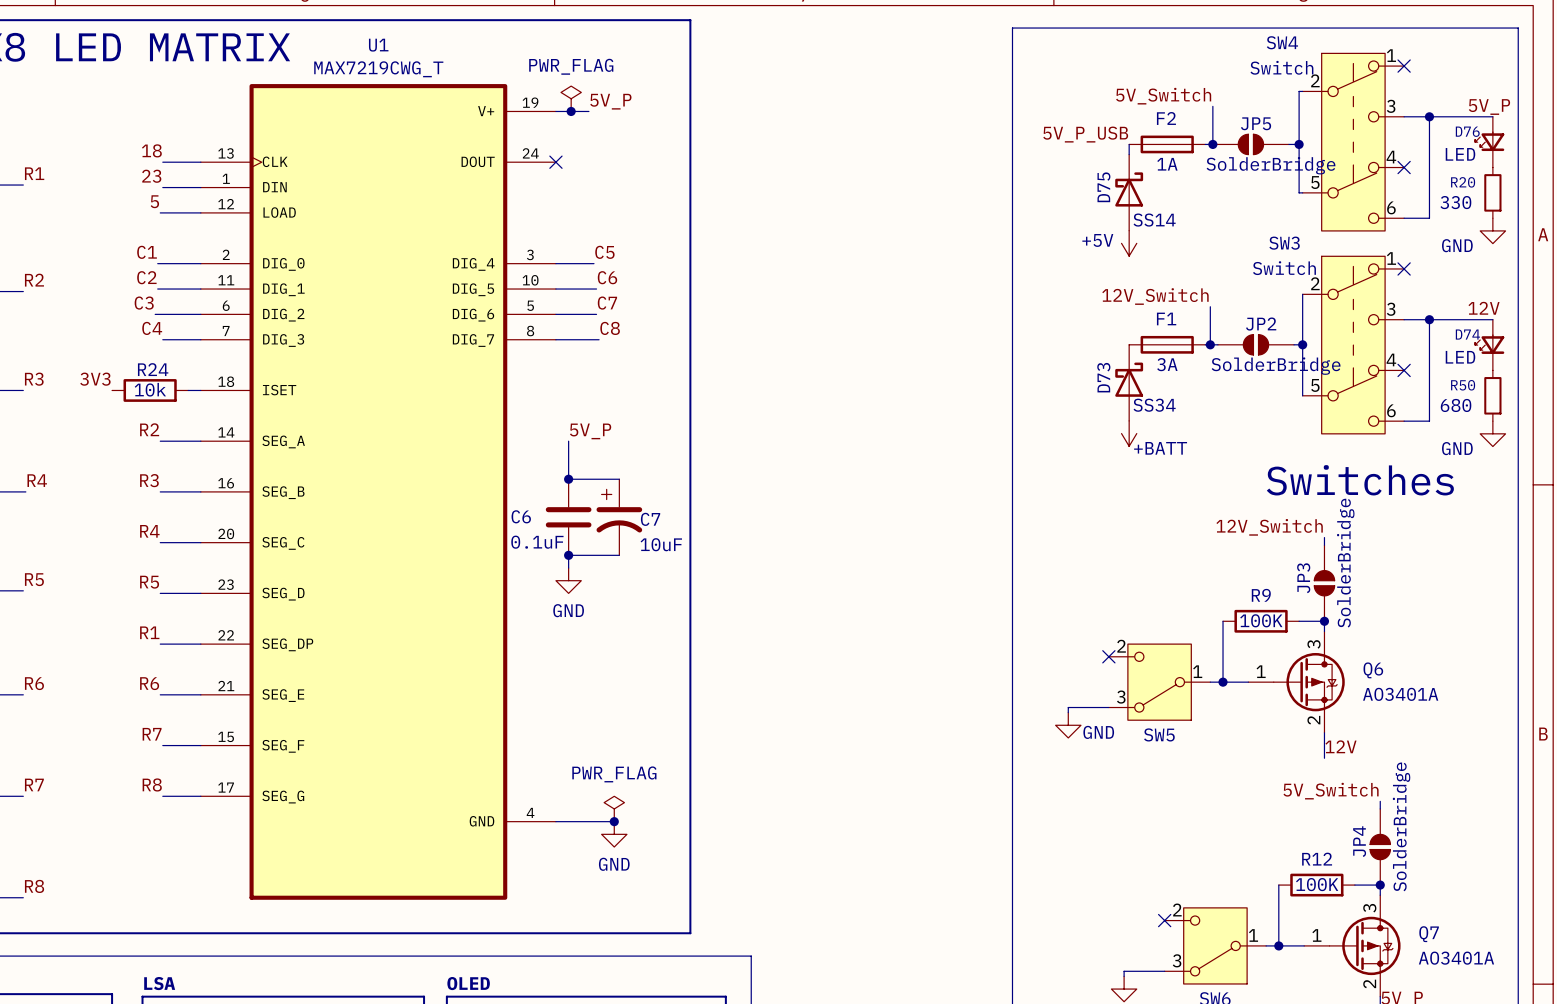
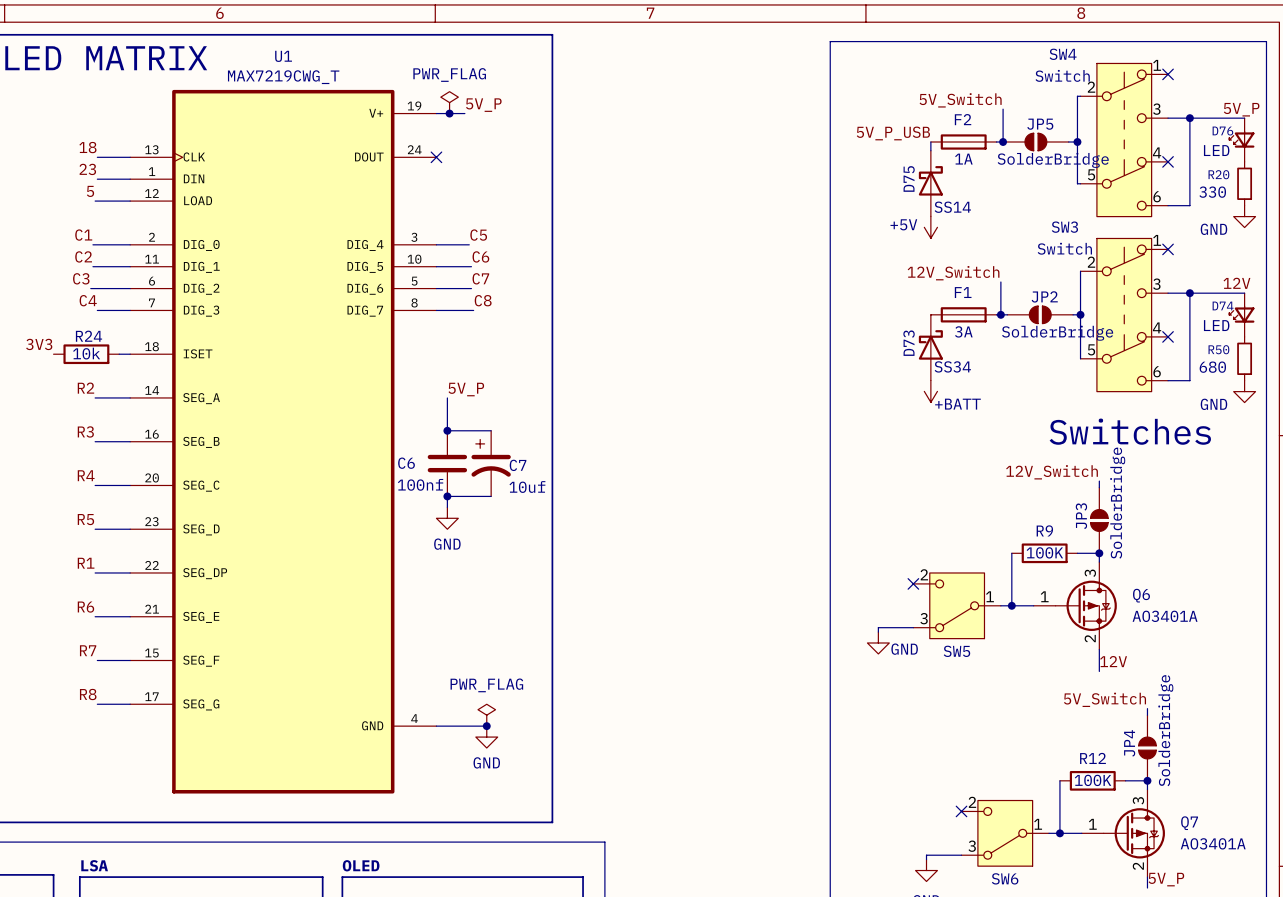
C6 value: 0.1uF (537, 542) -> 100nf (420, 484)
C7 value: 10uF (661, 544) -> 10uf (527, 487)

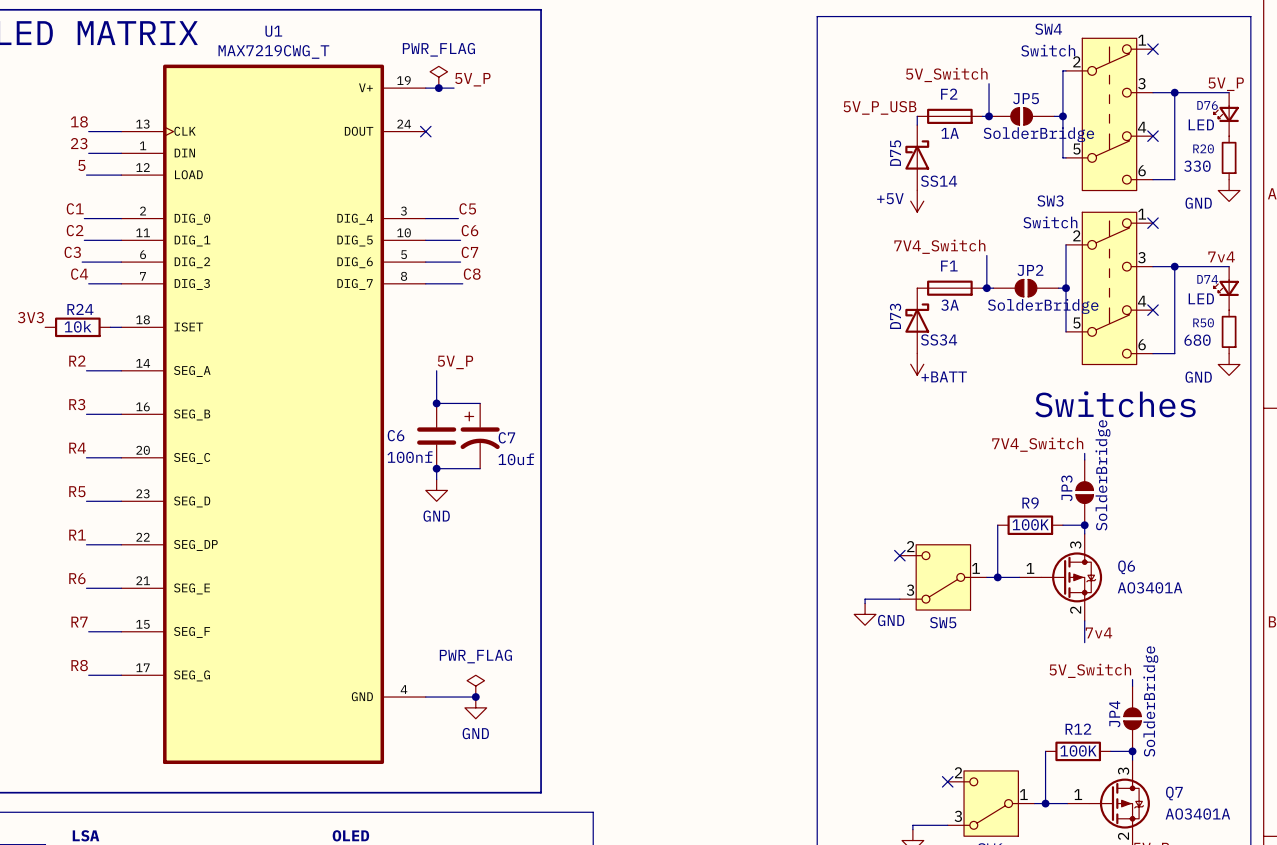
label: 12V_Switch (953, 273) -> 7V4_Switch (939, 246)
label: 12V (1236, 283) -> 7v4 (1221, 256)
label: 12V_Switch (1052, 472) -> 7V4_Switch (1037, 444)
label: 12V (1113, 661) -> 7v4 (1098, 632)

